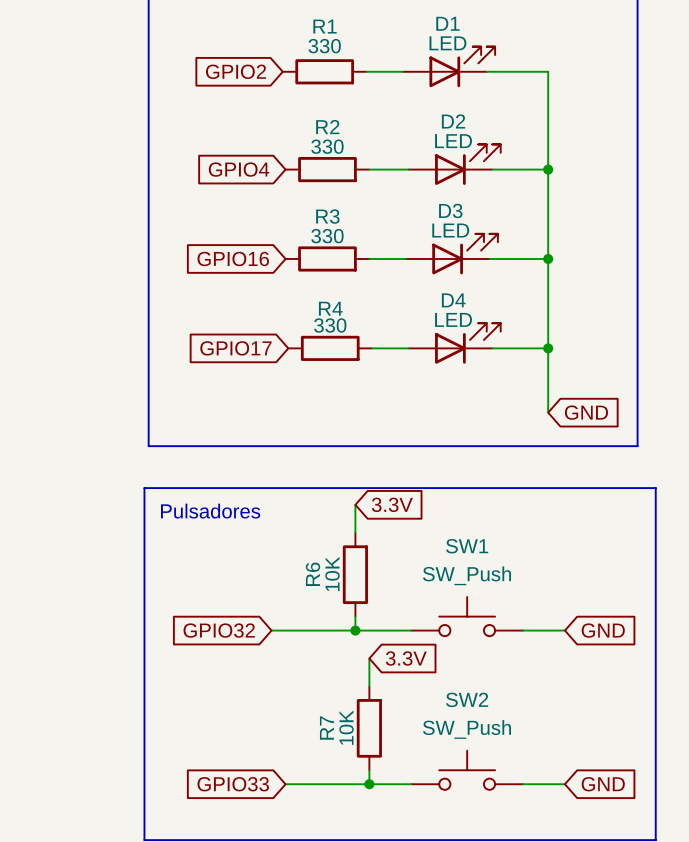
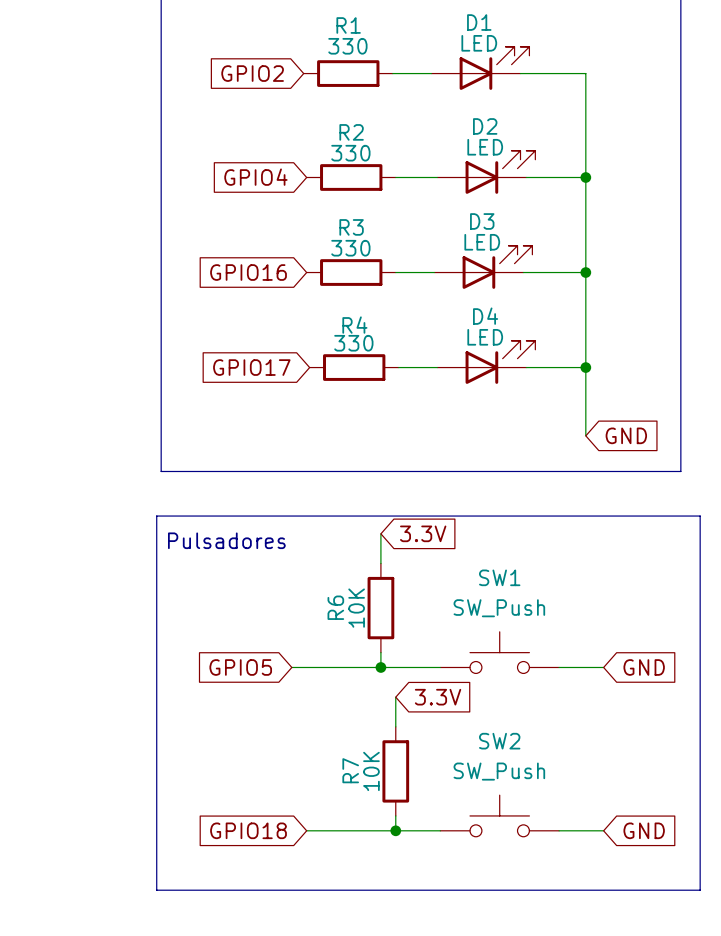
global label: GPIO32 (219, 630) -> GPIO5 (240, 667)
global label: GPIO33 (233, 784) -> GPIO18 (248, 830)

